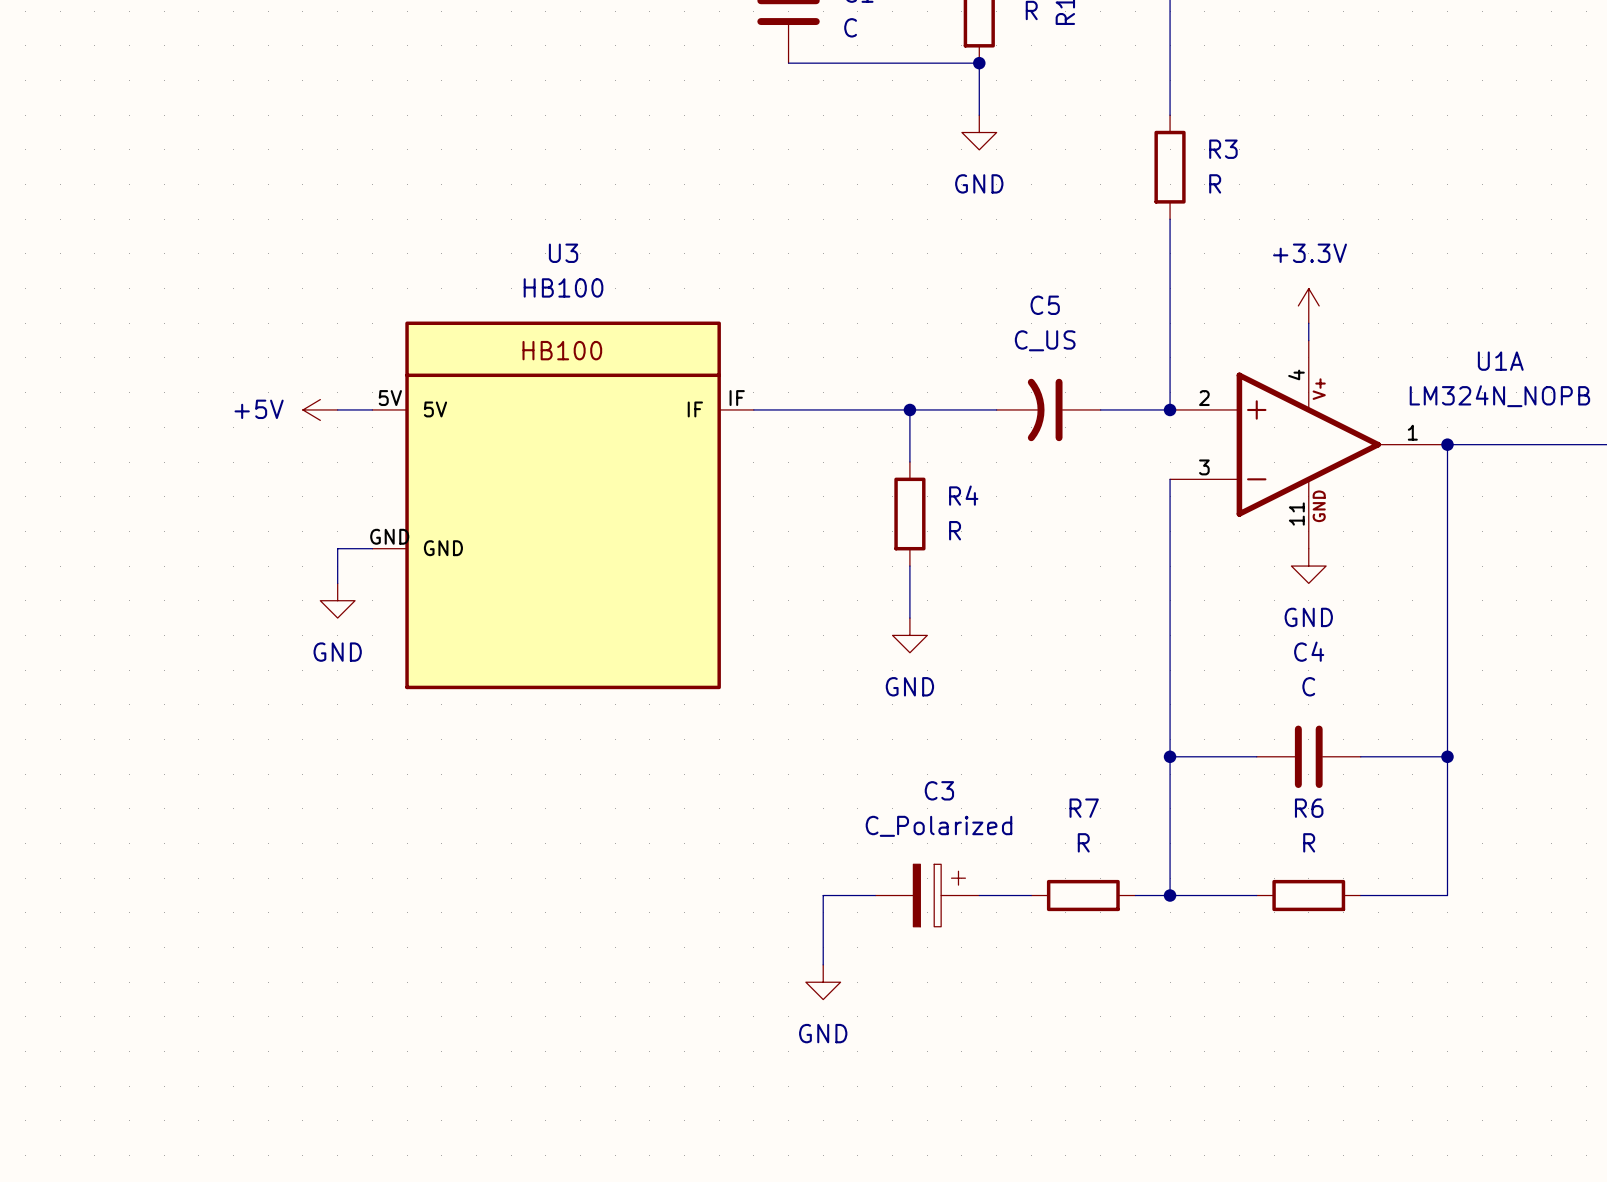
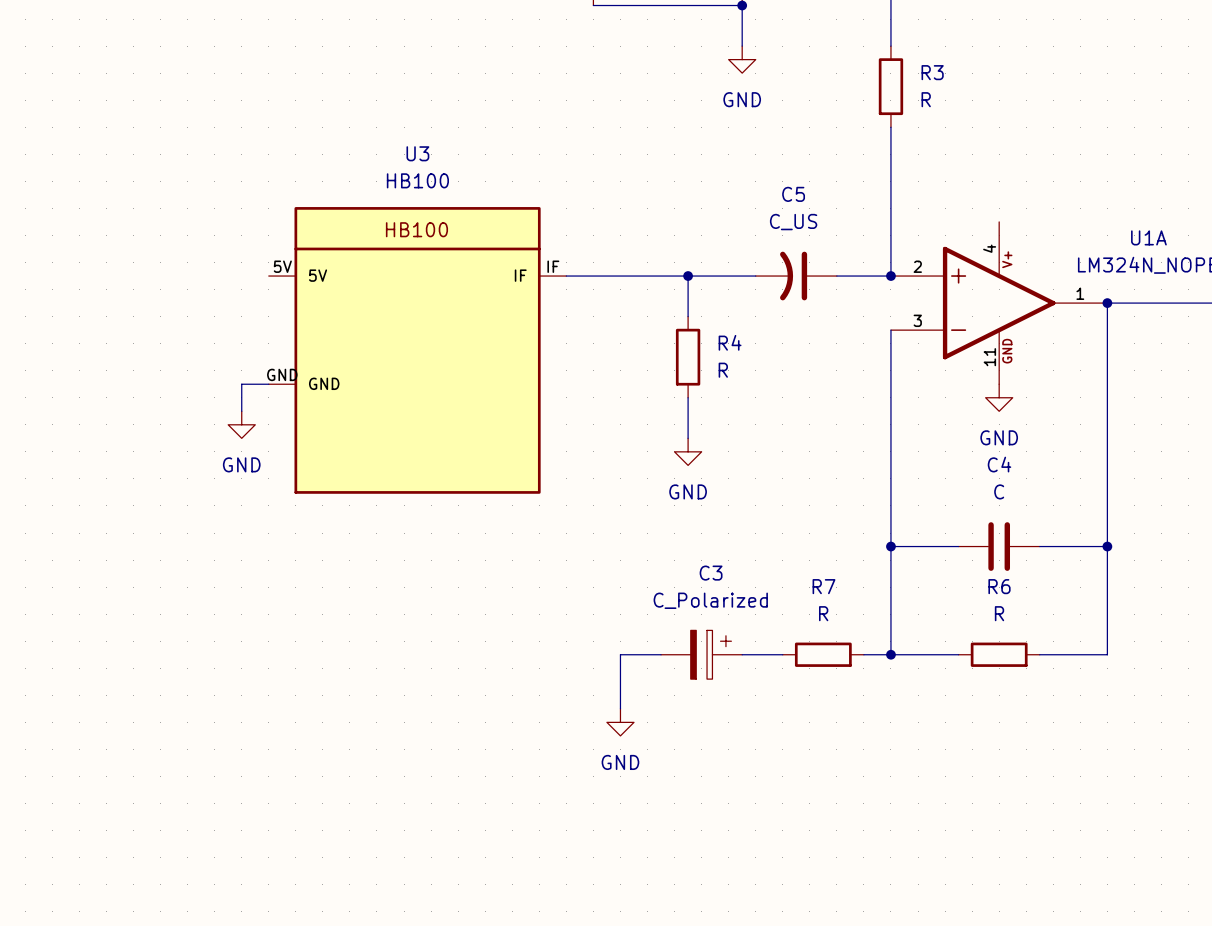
power symbol: +3.3V (1308, 305) -> none
wire: (1308, 323) (1308, 340) -> none
power symbol: +5V (320, 409) -> none
wire: (337, 409) (372, 409) -> none

